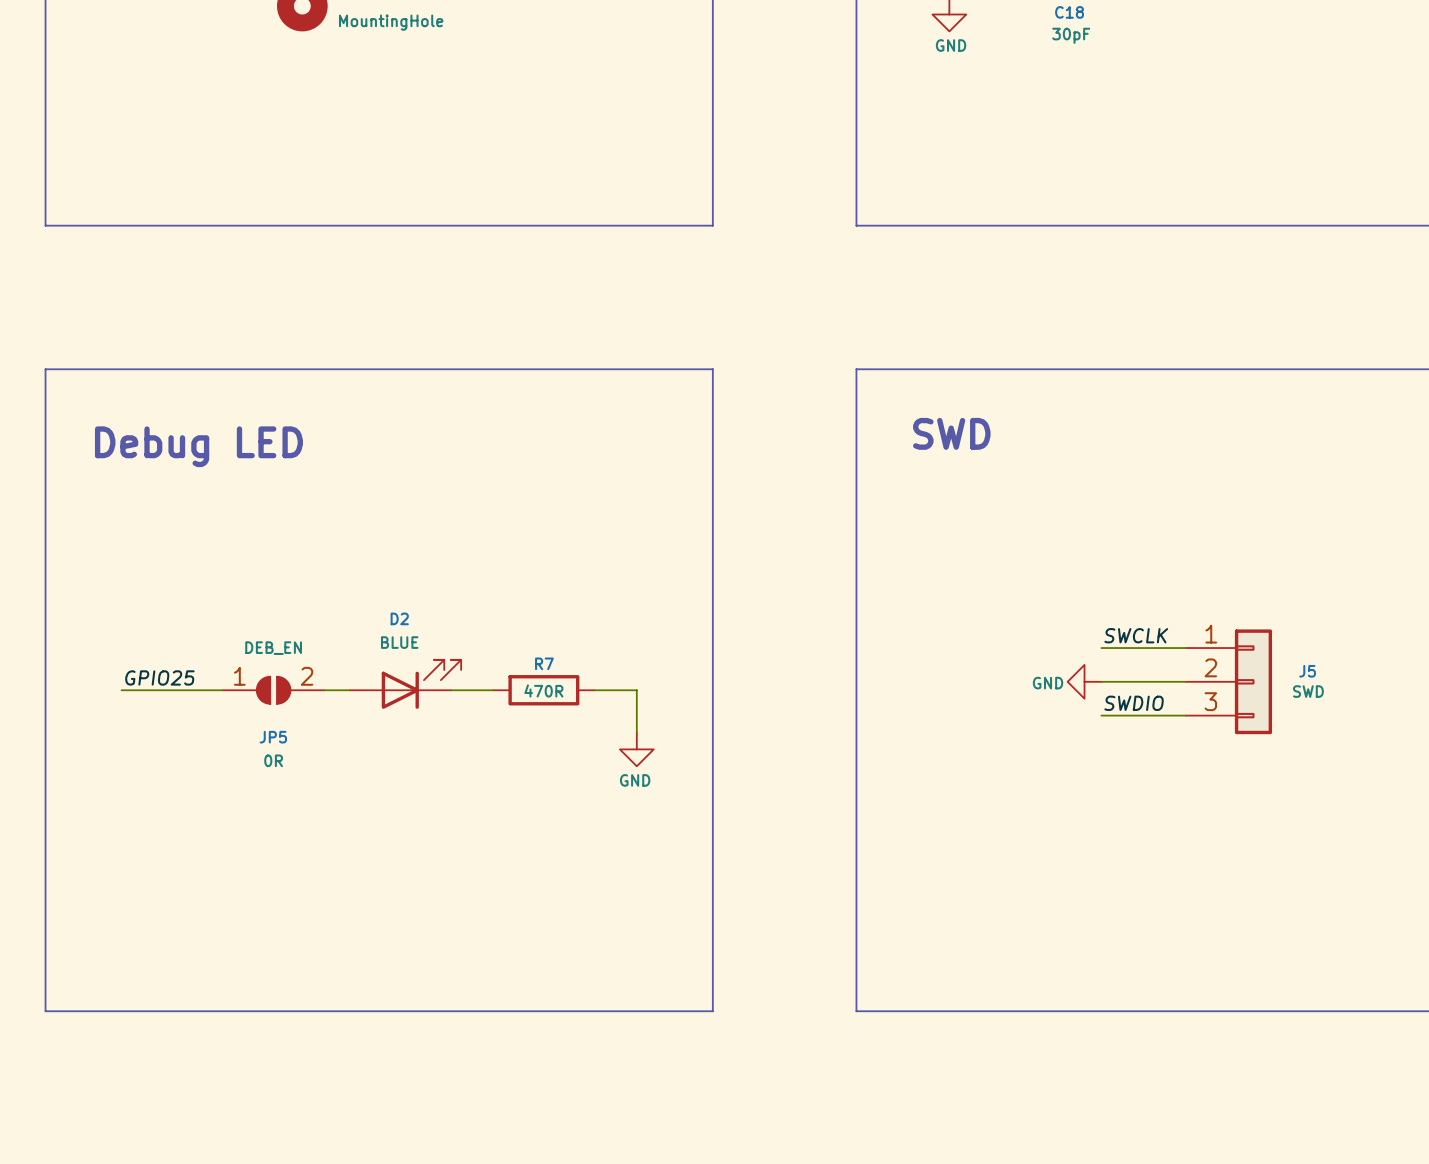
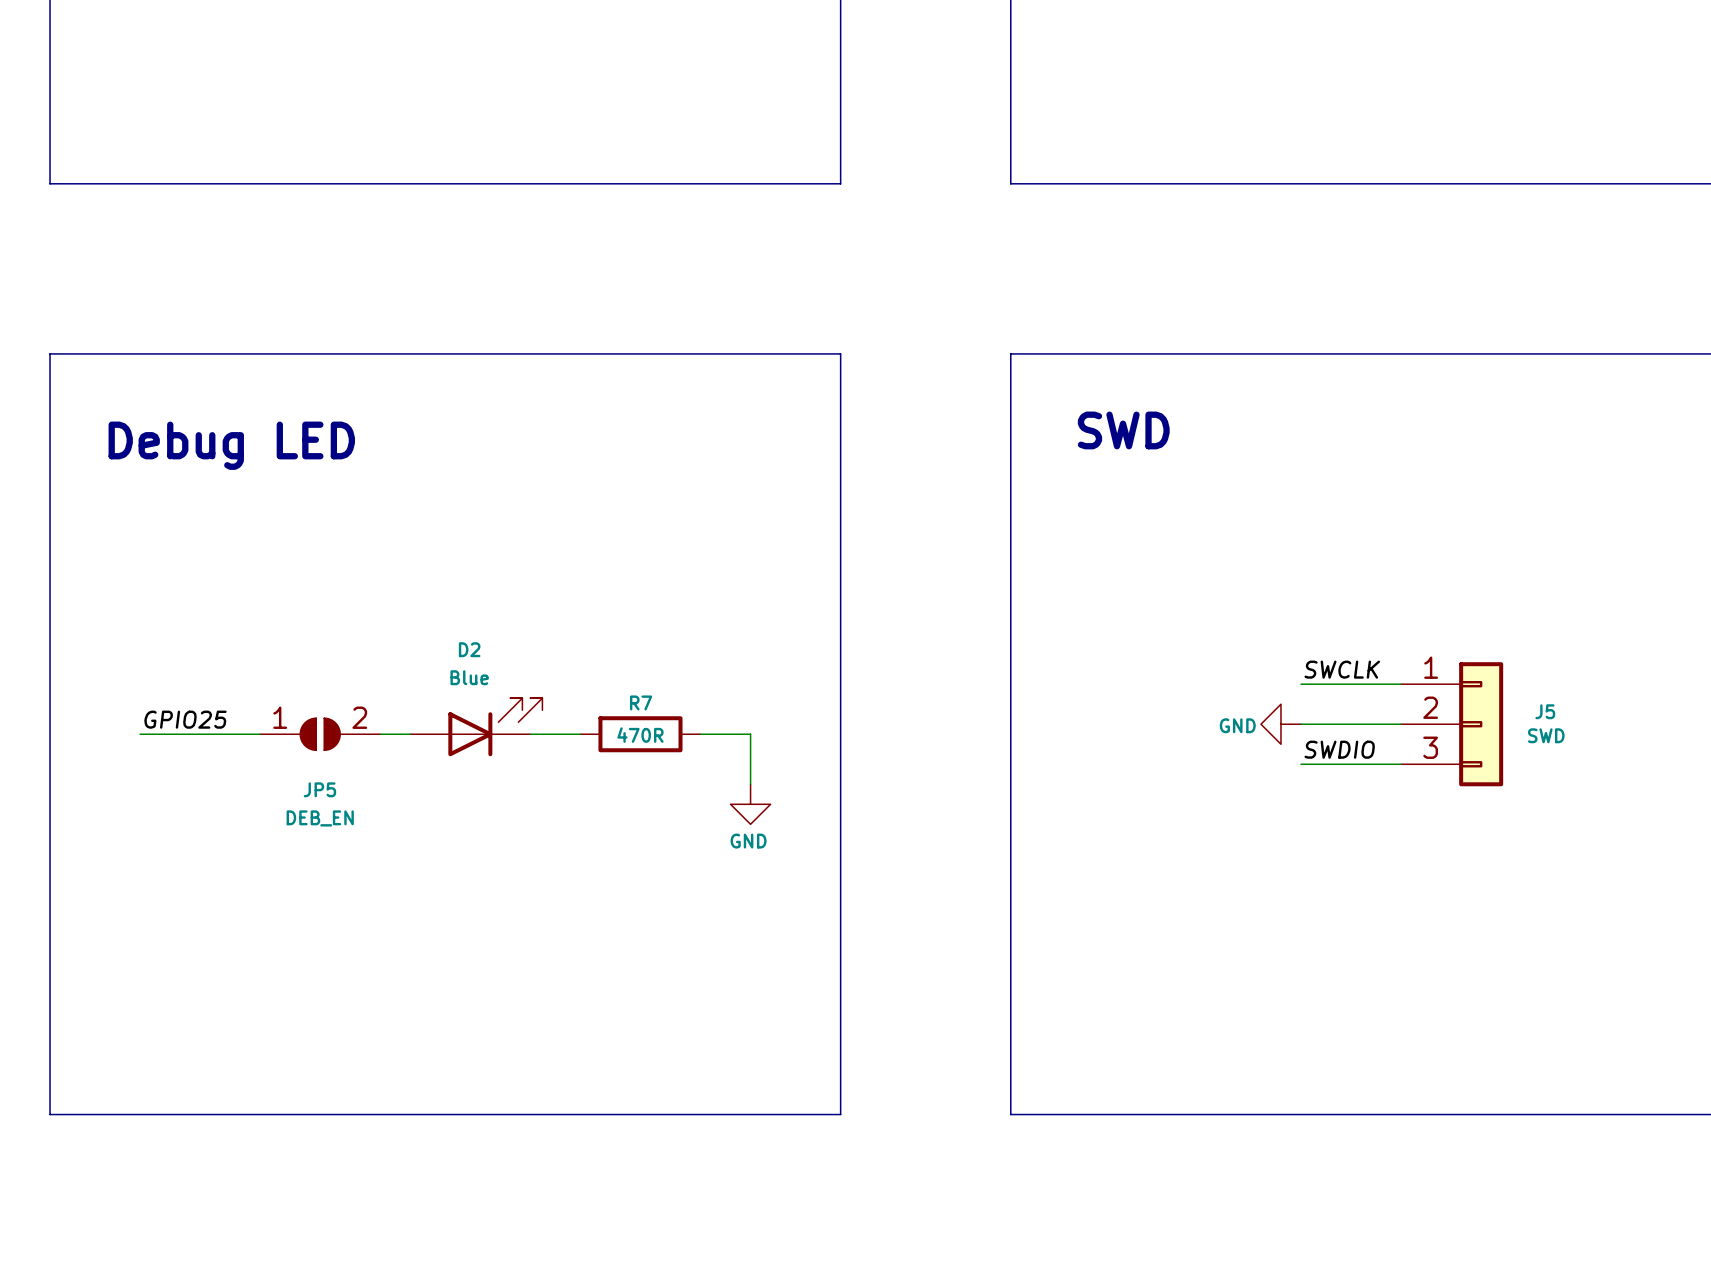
D2 value: BLUE (399, 642) -> Blue (469, 677)
JP5 text: DEB_EN (273, 648) -> none
JP5 value: 0R (273, 760) -> DEB_EN (320, 818)

